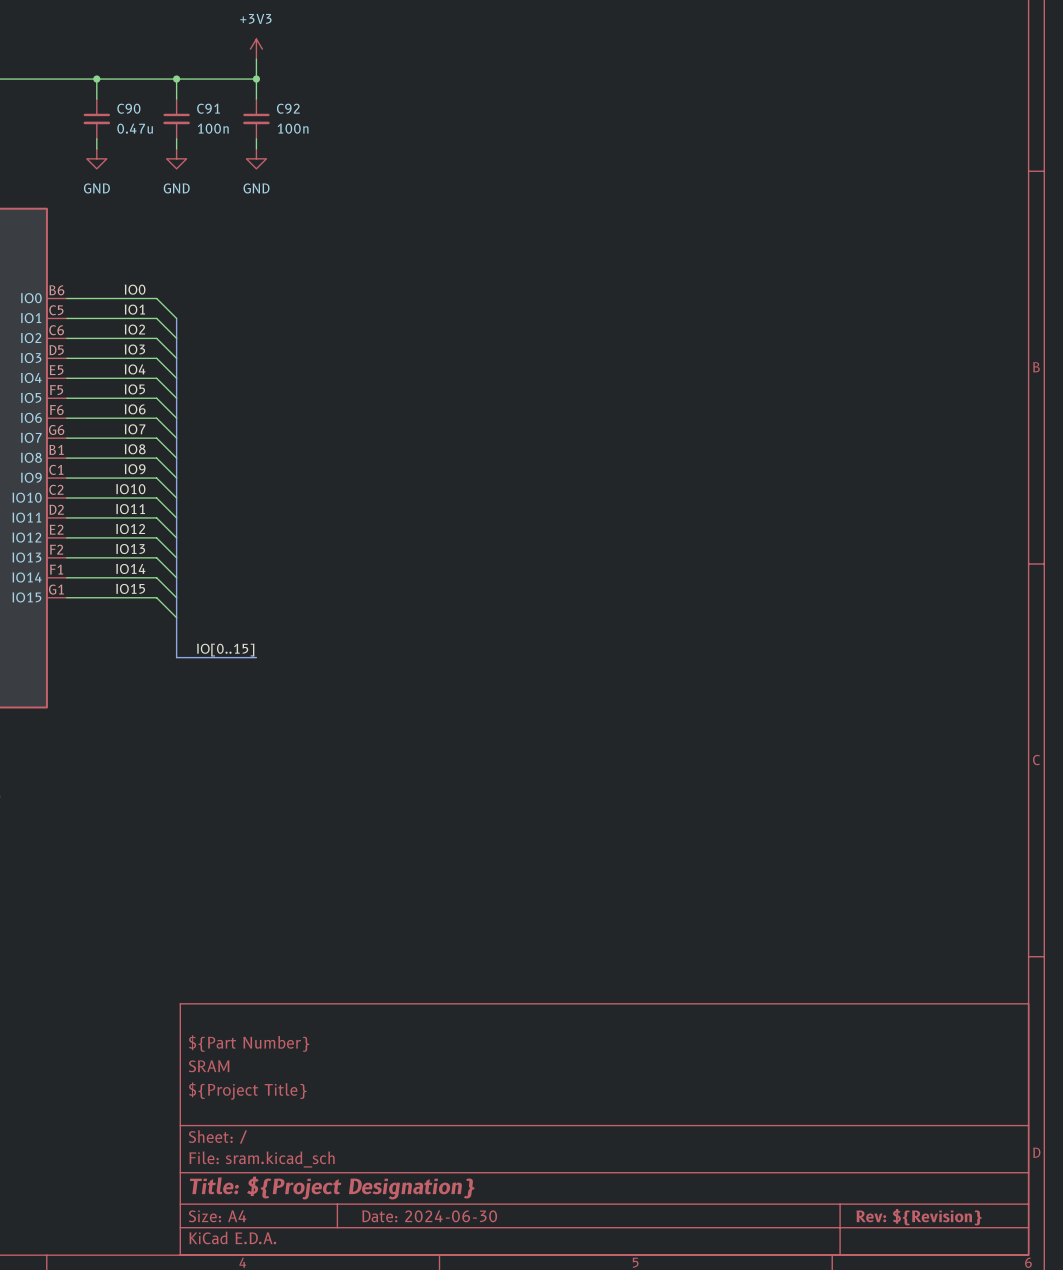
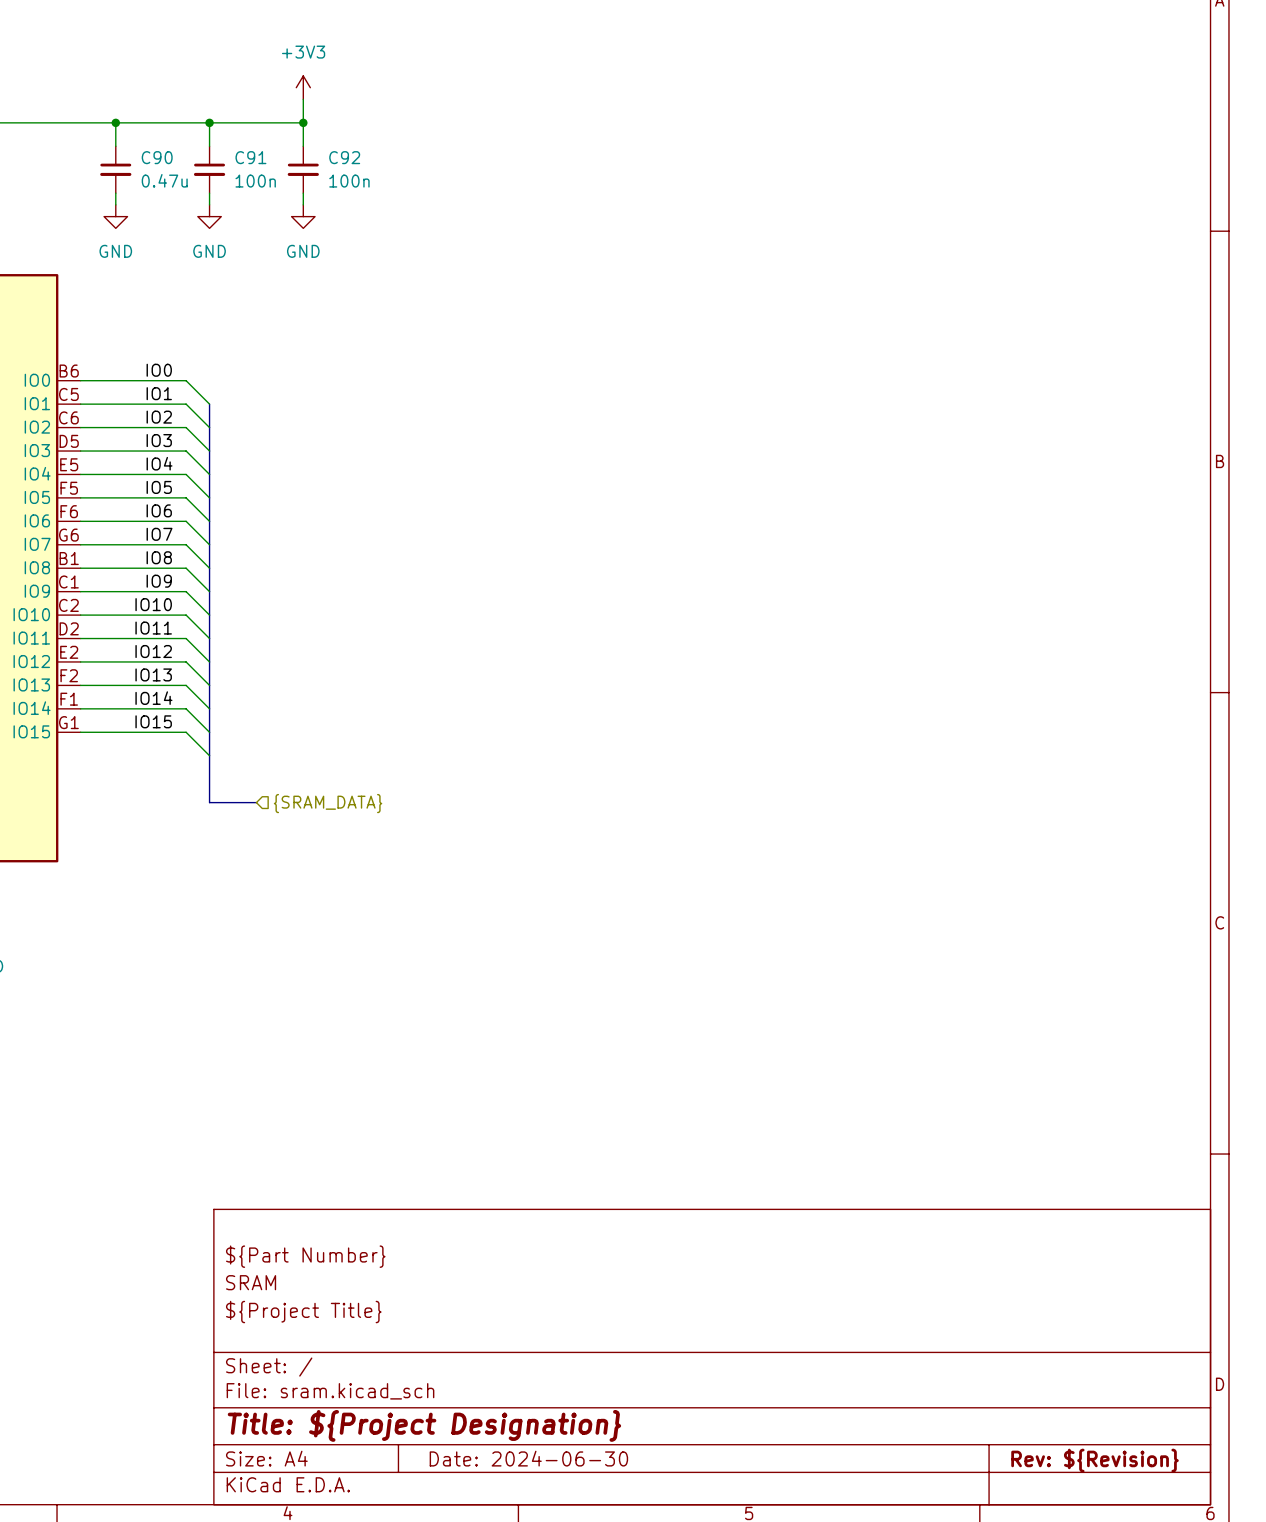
label: IO[0..15] (225, 650) -> none
bus: (216, 657) (256, 657) -> none
hierarchical label: none -> {SRAM_DATA} (328, 803)

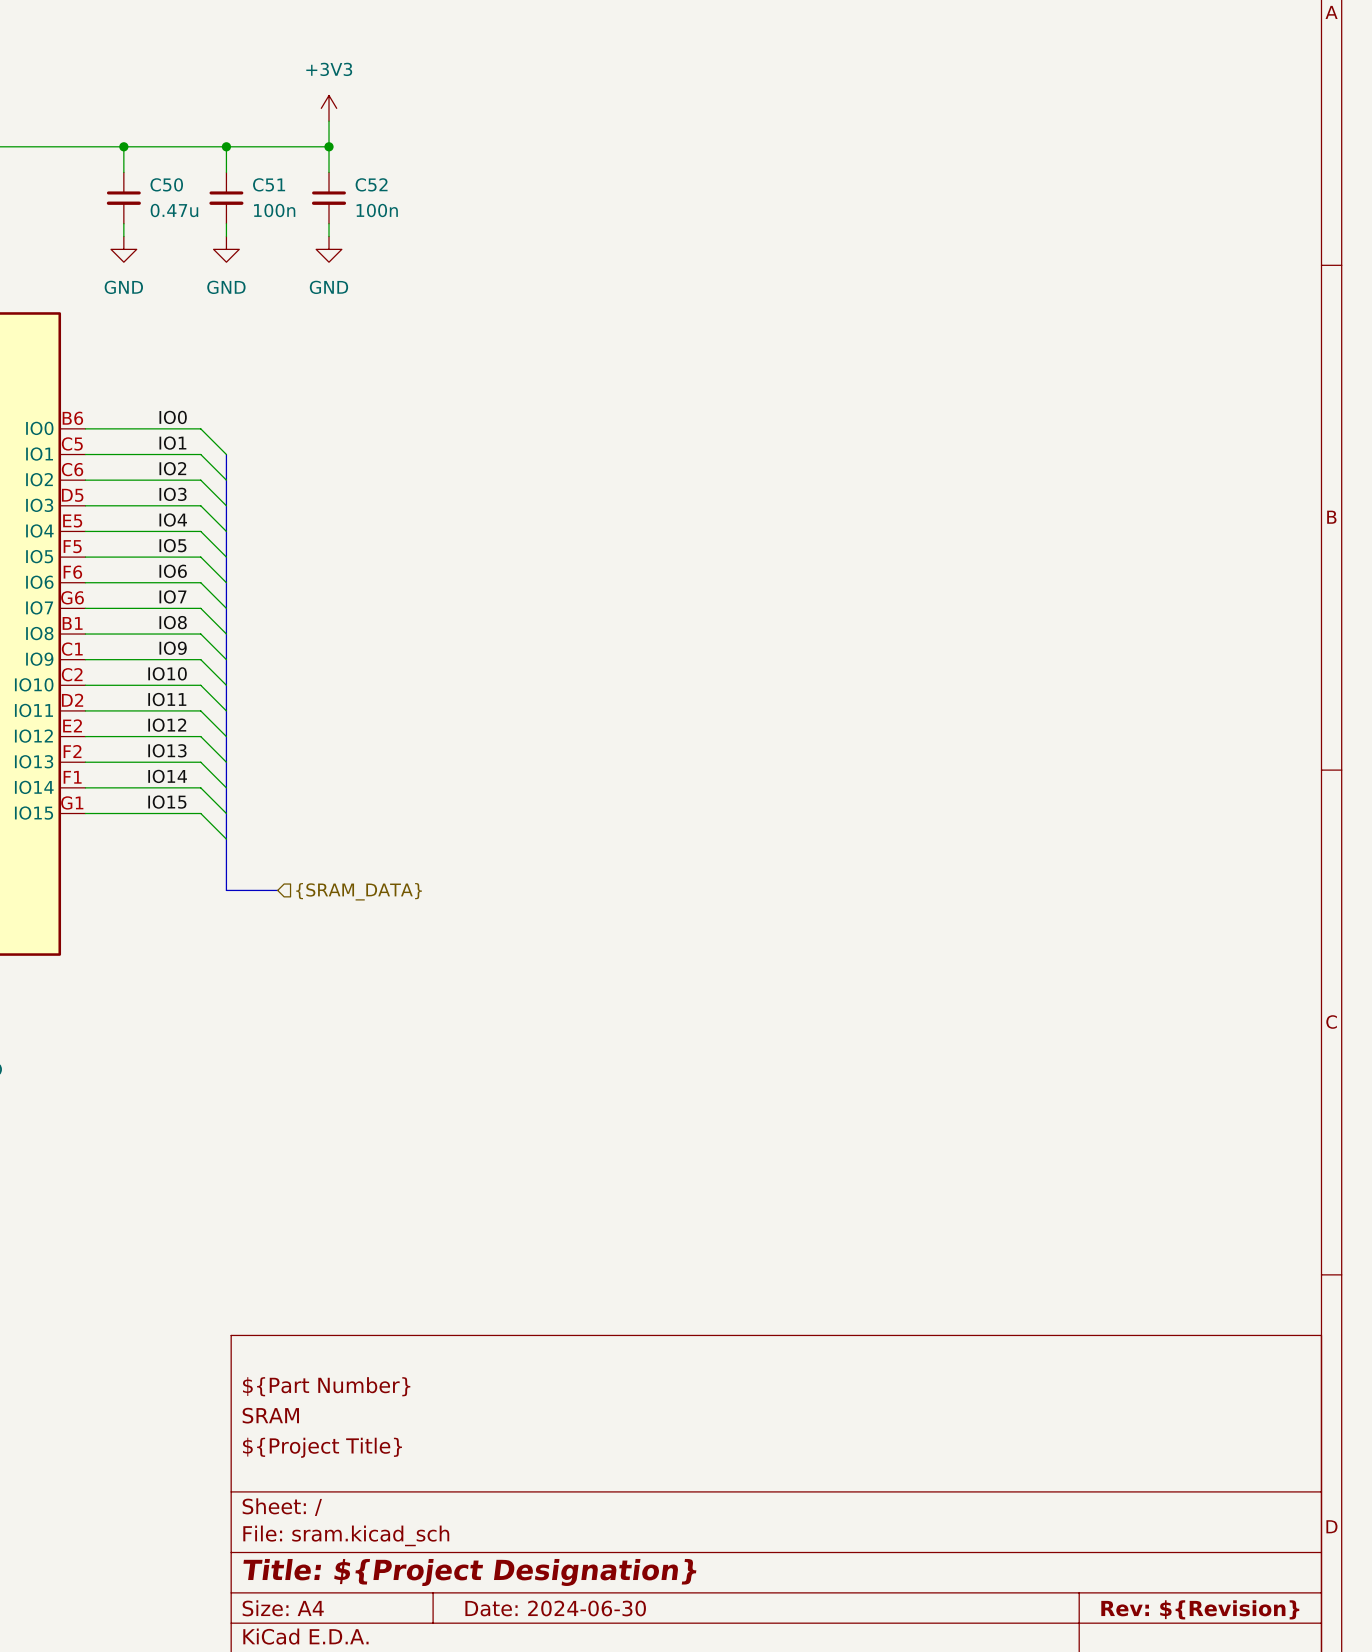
C90 name: C90 (157, 157) -> C50 (166, 184)
C91 name: C91 (250, 157) -> C51 (269, 184)
C92 name: C92 (344, 157) -> C52 (371, 184)

